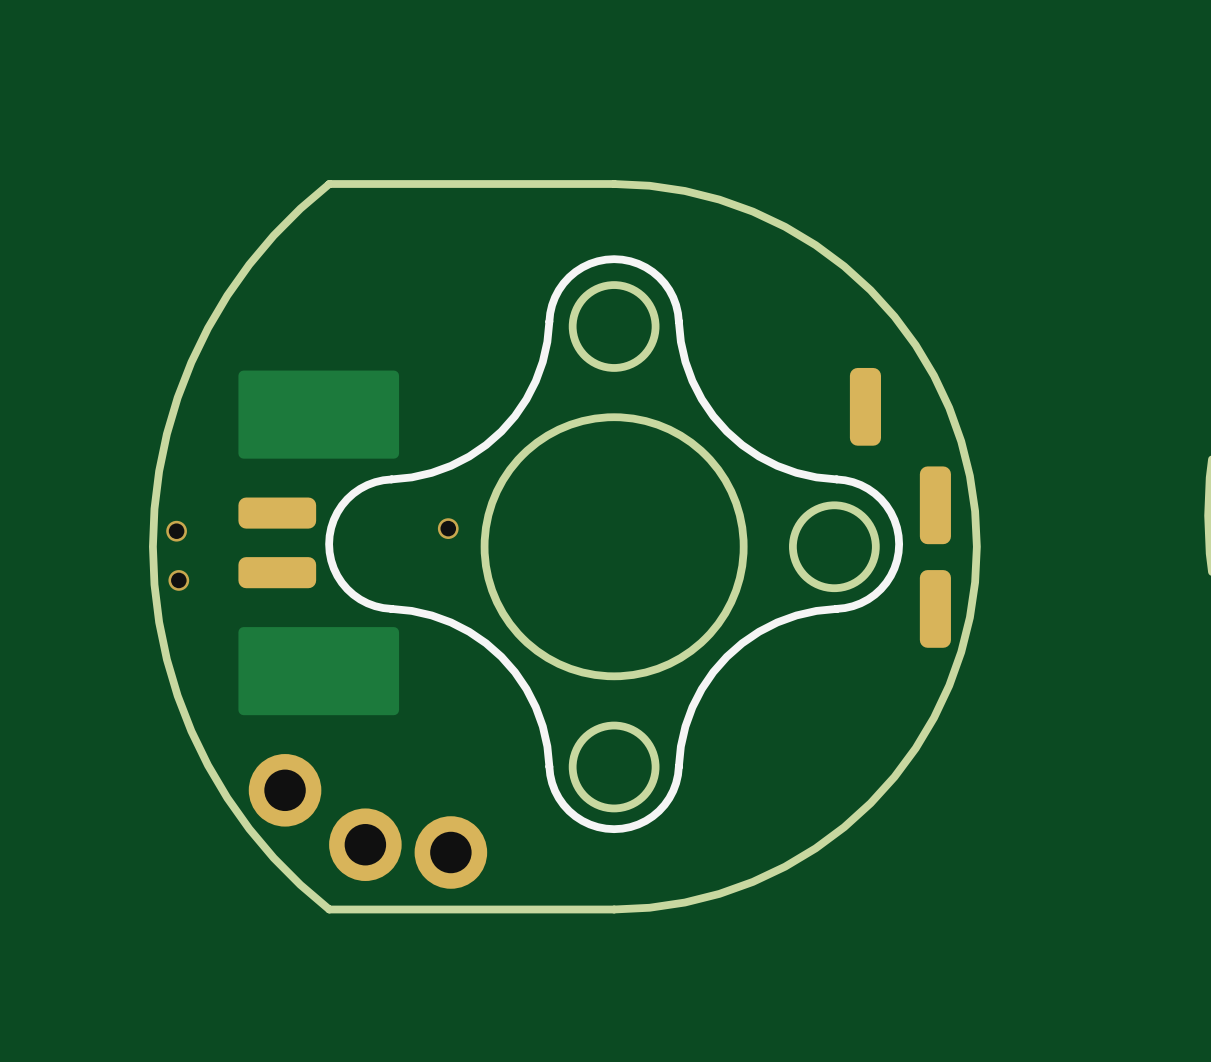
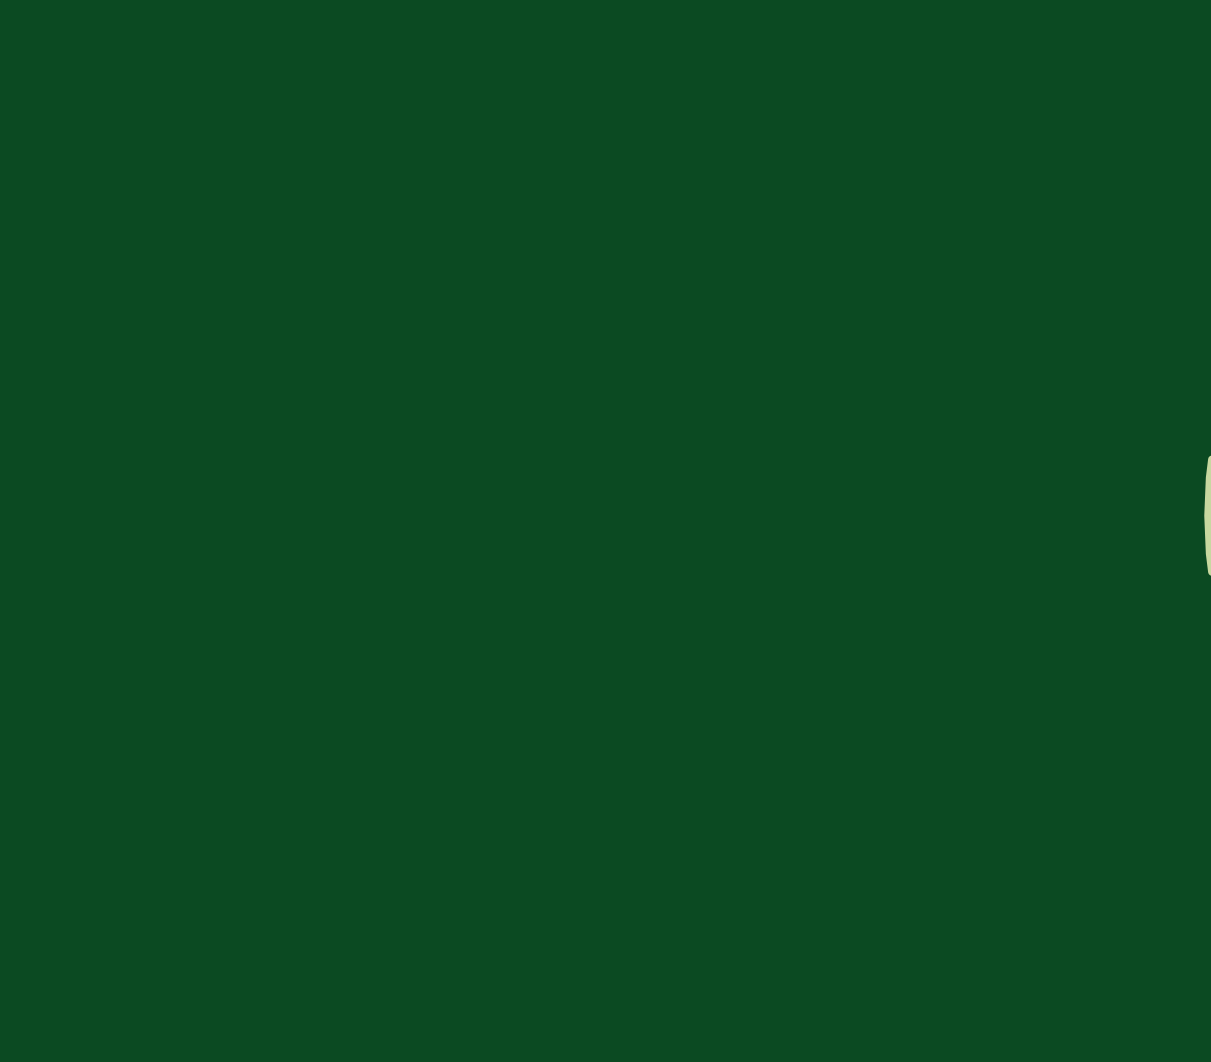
board edge: (614, 184) (329, 184) (300, 208) (273, 235) (249, 264) (227, 295) (207, 328) (191, 362) (177, 397) (166, 434) (159, 471) (154, 508) (152, 546) (154, 584) (159, 622) (166, 659) (177, 695) (191, 731) (207, 765) (227, 797) (249, 828) (273, 857) (300, 884) (329, 909) (614, 909) (649, 907) (684, 902) (719, 893) (752, 881) (785, 866) (815, 848) (844, 827) (870, 803) (894, 776) (915, 748) (934, 717) (949, 685) (961, 652) (969, 617) (975, 582) (976, 546) (975, 511) (969, 475) (961, 441) (949, 407) (934, 375) (915, 345) (894, 316) (870, 290) (844, 266) (815, 245) (785, 226) (752, 211) (719, 199) (684, 190) (649, 185) (614, 184) -> none
round board edge: [568, 281, 660, 372] -> none
line: (678, 321) (685, 361) (692, 381) (701, 399) (726, 431) (759, 456) (777, 465) (816, 477) (853, 482) (874, 493) (886, 505) (894, 519) (898, 535) (898, 552) (894, 568) (886, 582) (868, 599) (853, 606) (816, 610) (777, 622) (759, 631) (726, 656) (701, 689) (692, 707) (680, 746) (676, 783) (664, 804) (652, 816) (638, 824) (622, 828) (605, 828) (589, 824) (575, 816) (558, 798) (552, 783) (547, 746) (535, 707) (526, 689) (501, 656) (469, 631) (451, 622) (411, 610) (375, 606) (353, 594) (341, 582) (333, 568) (329, 552) (329, 535) (333, 519) (341, 505) (360, 488) (375, 482) (411, 477) (451, 465) (486, 445) (501, 431) (526, 399) (535, 381) (542, 361) (550, 313) (554, 297) (563, 283) (582, 267) (597, 261) (614, 259) (630, 261) (645, 267) (659, 277) (669, 290) (676, 305) (678, 321) -> none
drawing: [238, 370, 400, 459] -> none
part: (865, 406) -> none
round board edge: [480, 413, 748, 681] -> none
round board edge: [789, 501, 880, 593] -> none
part: (935, 505) -> none
part: (277, 513) -> none
via: (448, 528) -> none
via: (176, 531) -> none
part: (277, 572) -> none
via: (178, 580) -> none
part: (935, 608) -> none
drawing: [238, 627, 400, 716] -> none
round board edge: [568, 721, 660, 813] -> none
part: (285, 790) -> none
part: (365, 844) -> none
part: (450, 852) -> none

